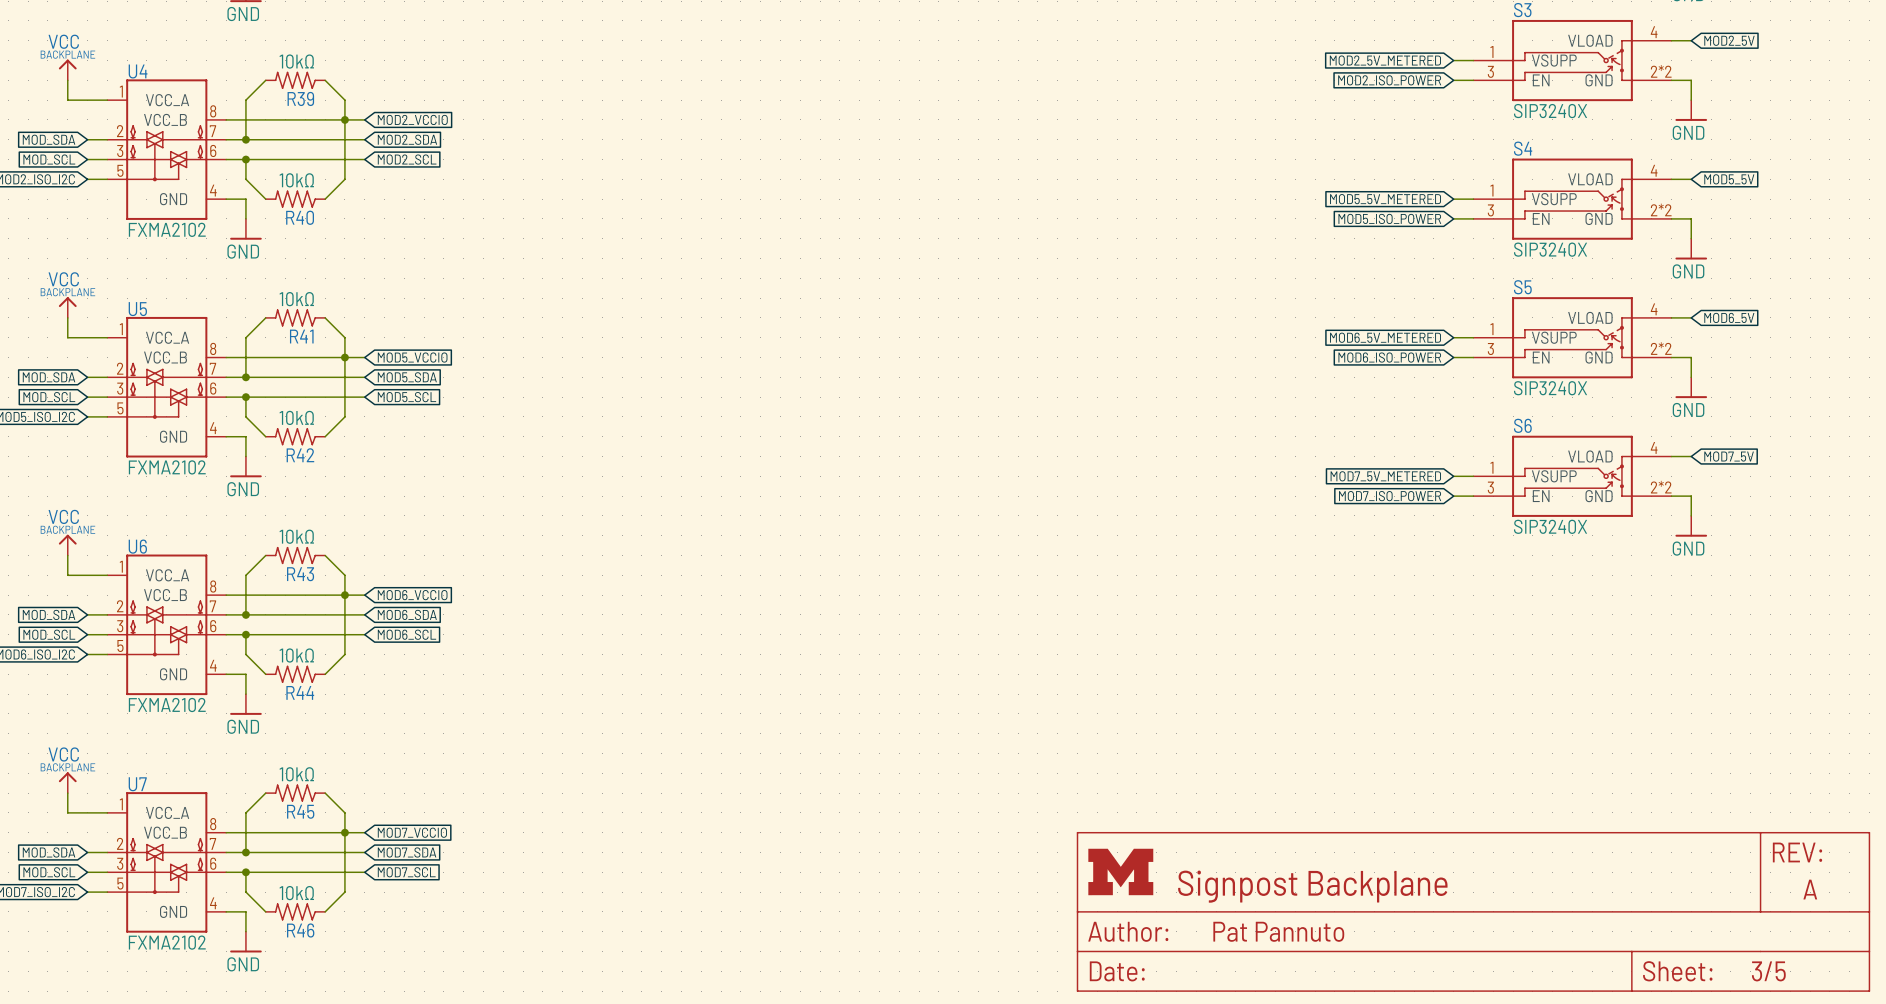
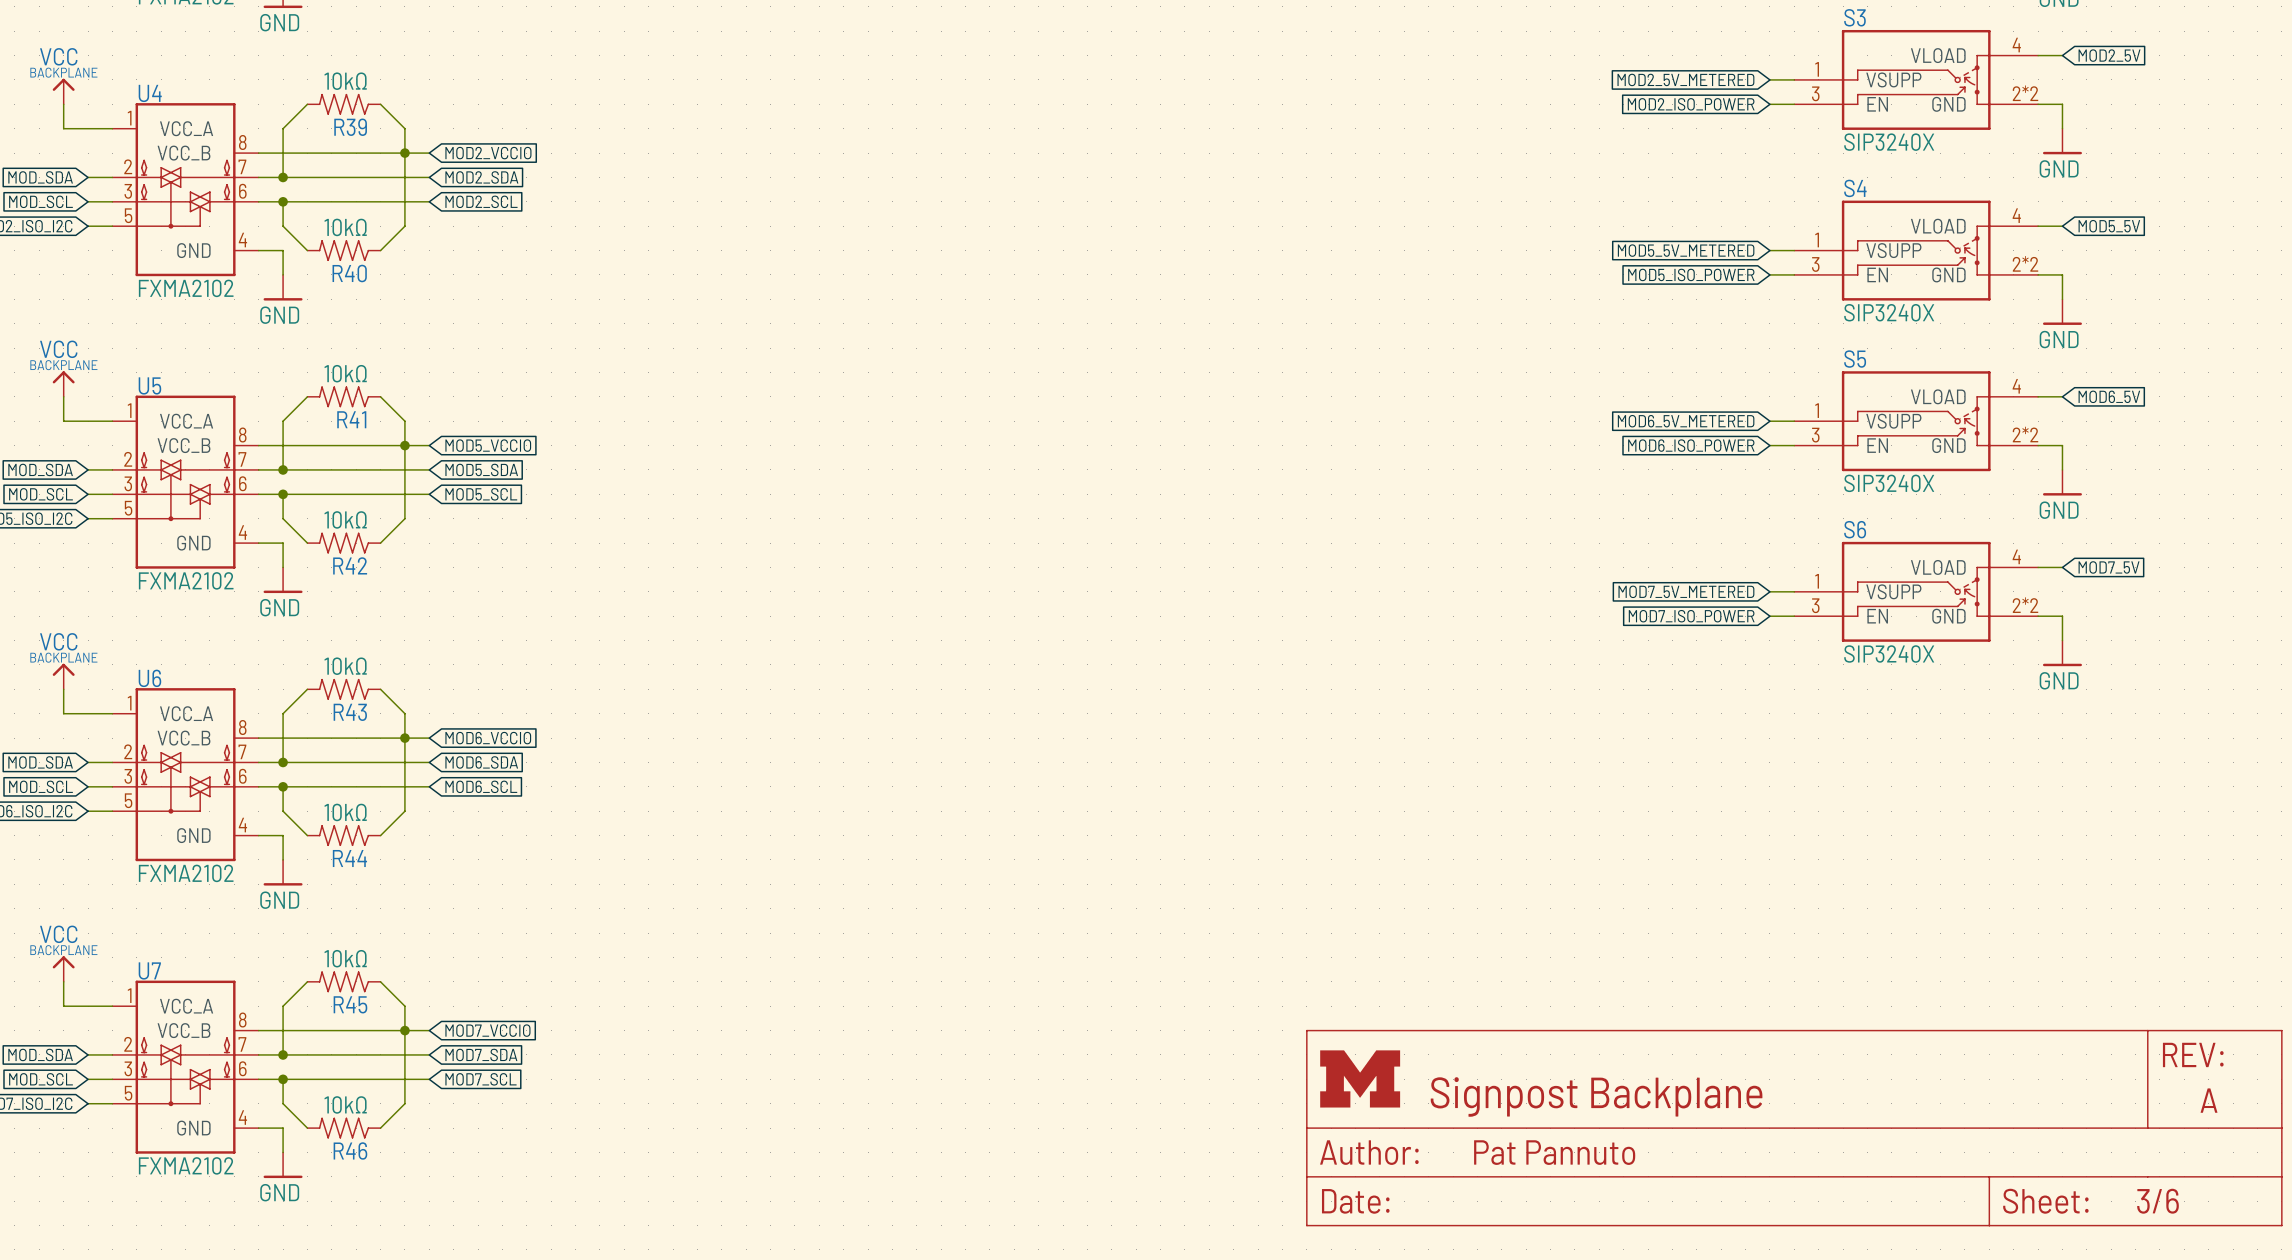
part text: 3/5 (1768, 971) -> 3/6 (2158, 1201)

